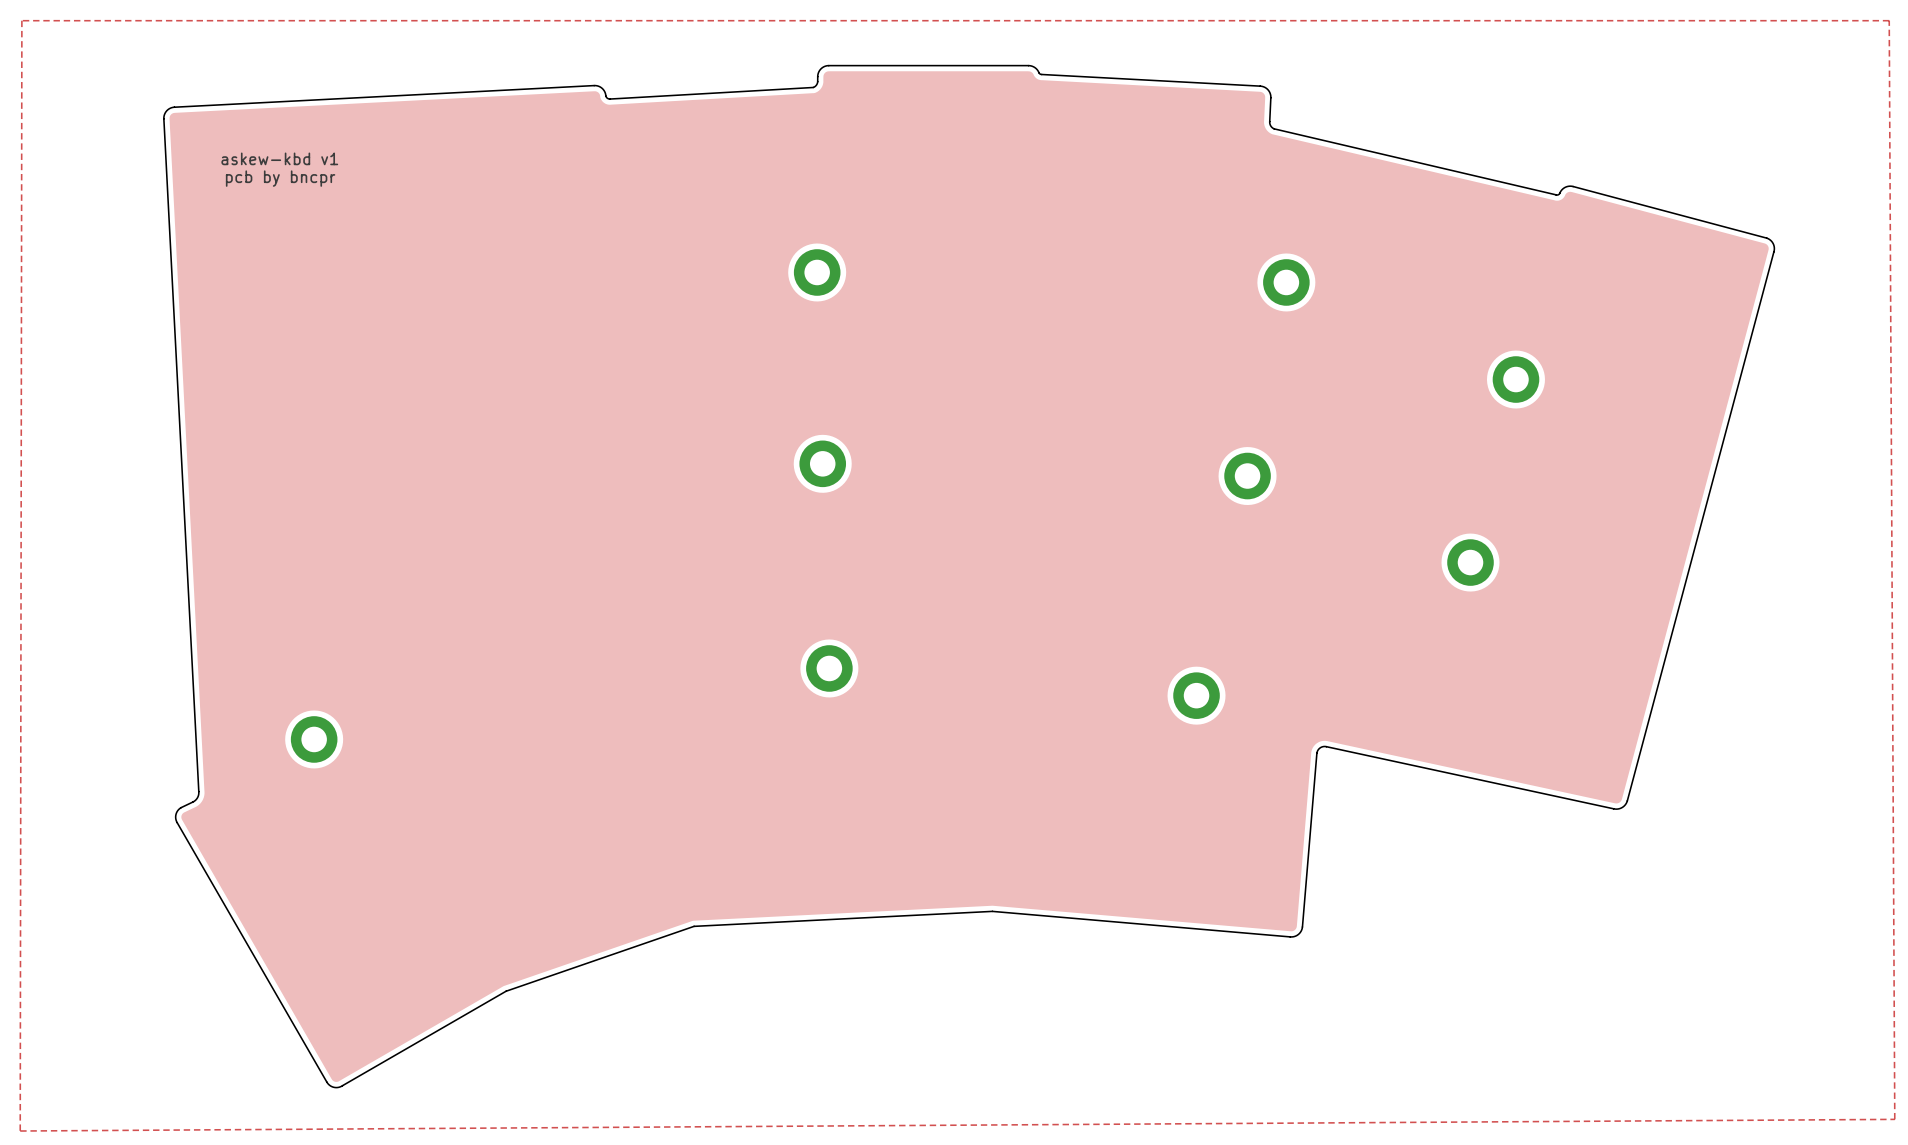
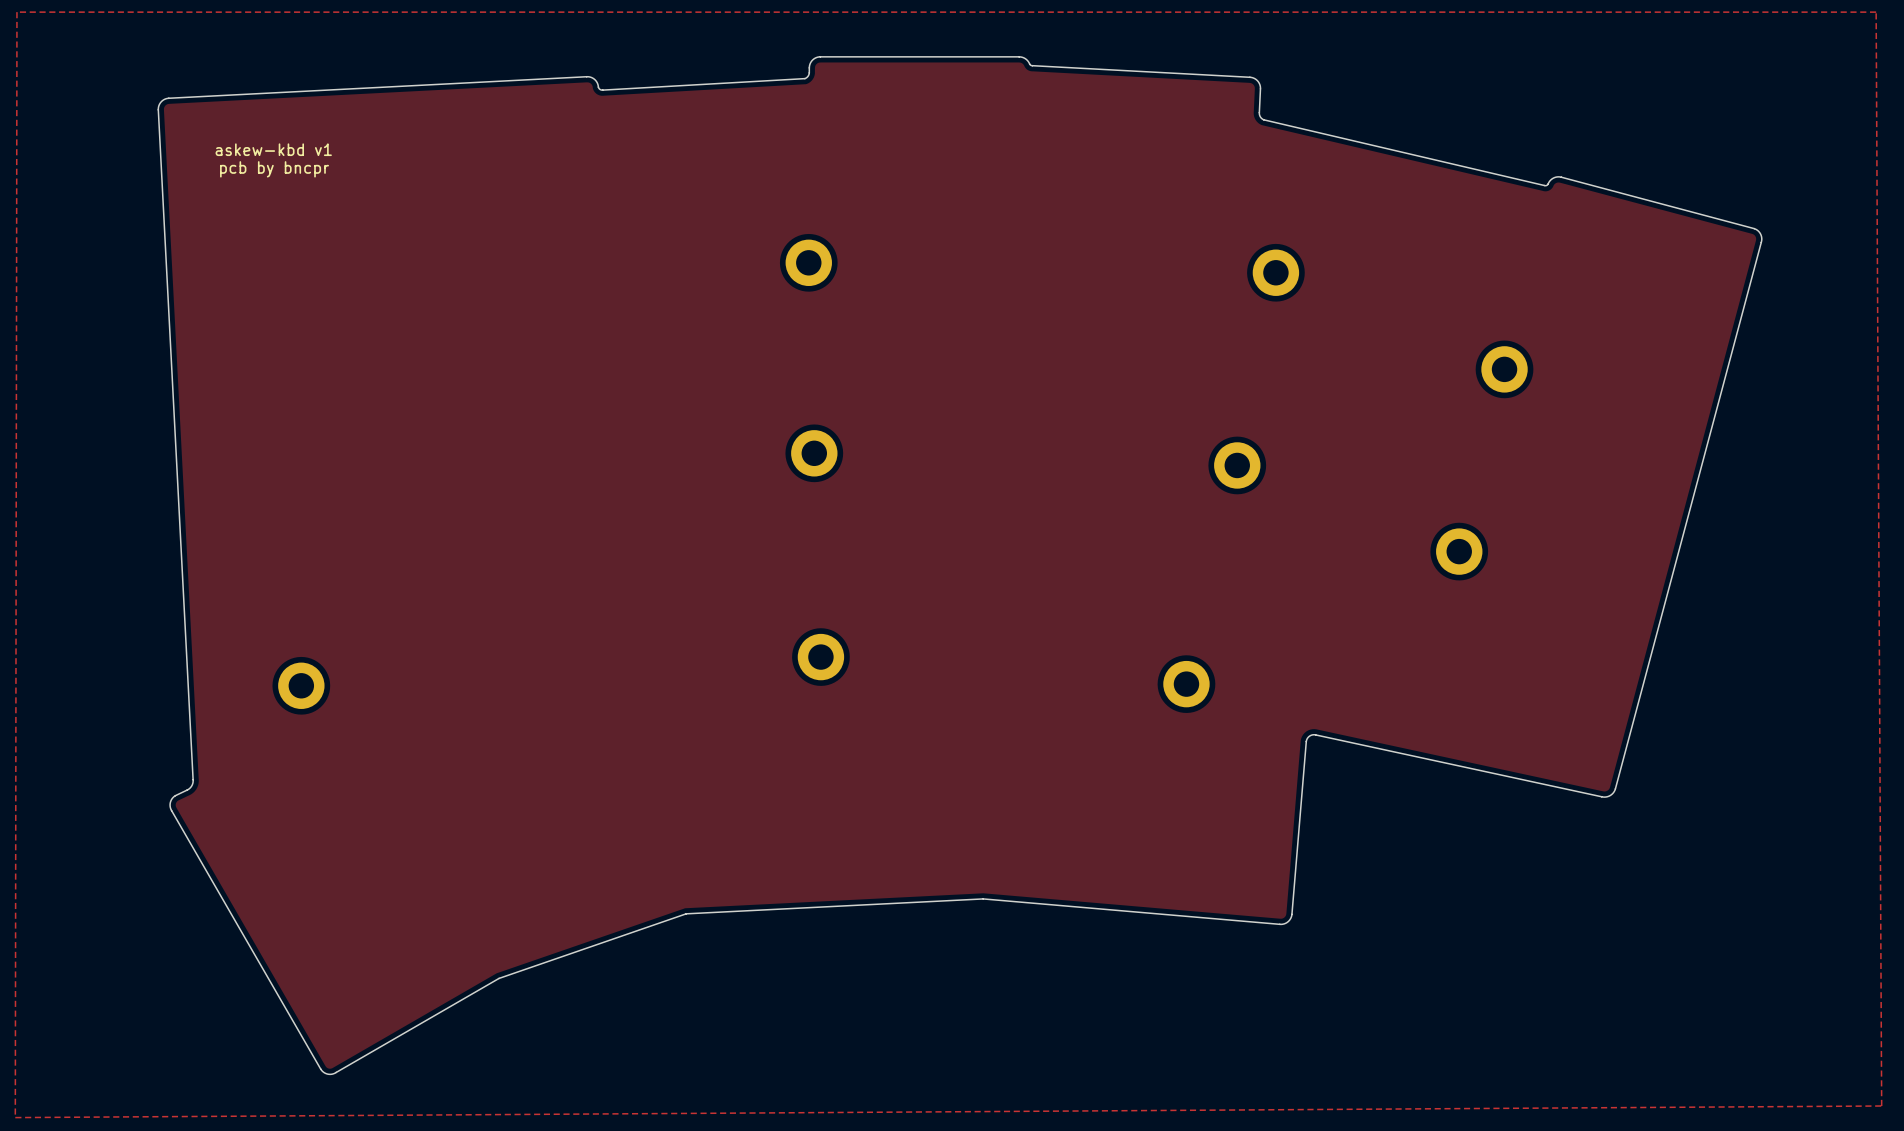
part position: (314, 739) -> (301, 685)

